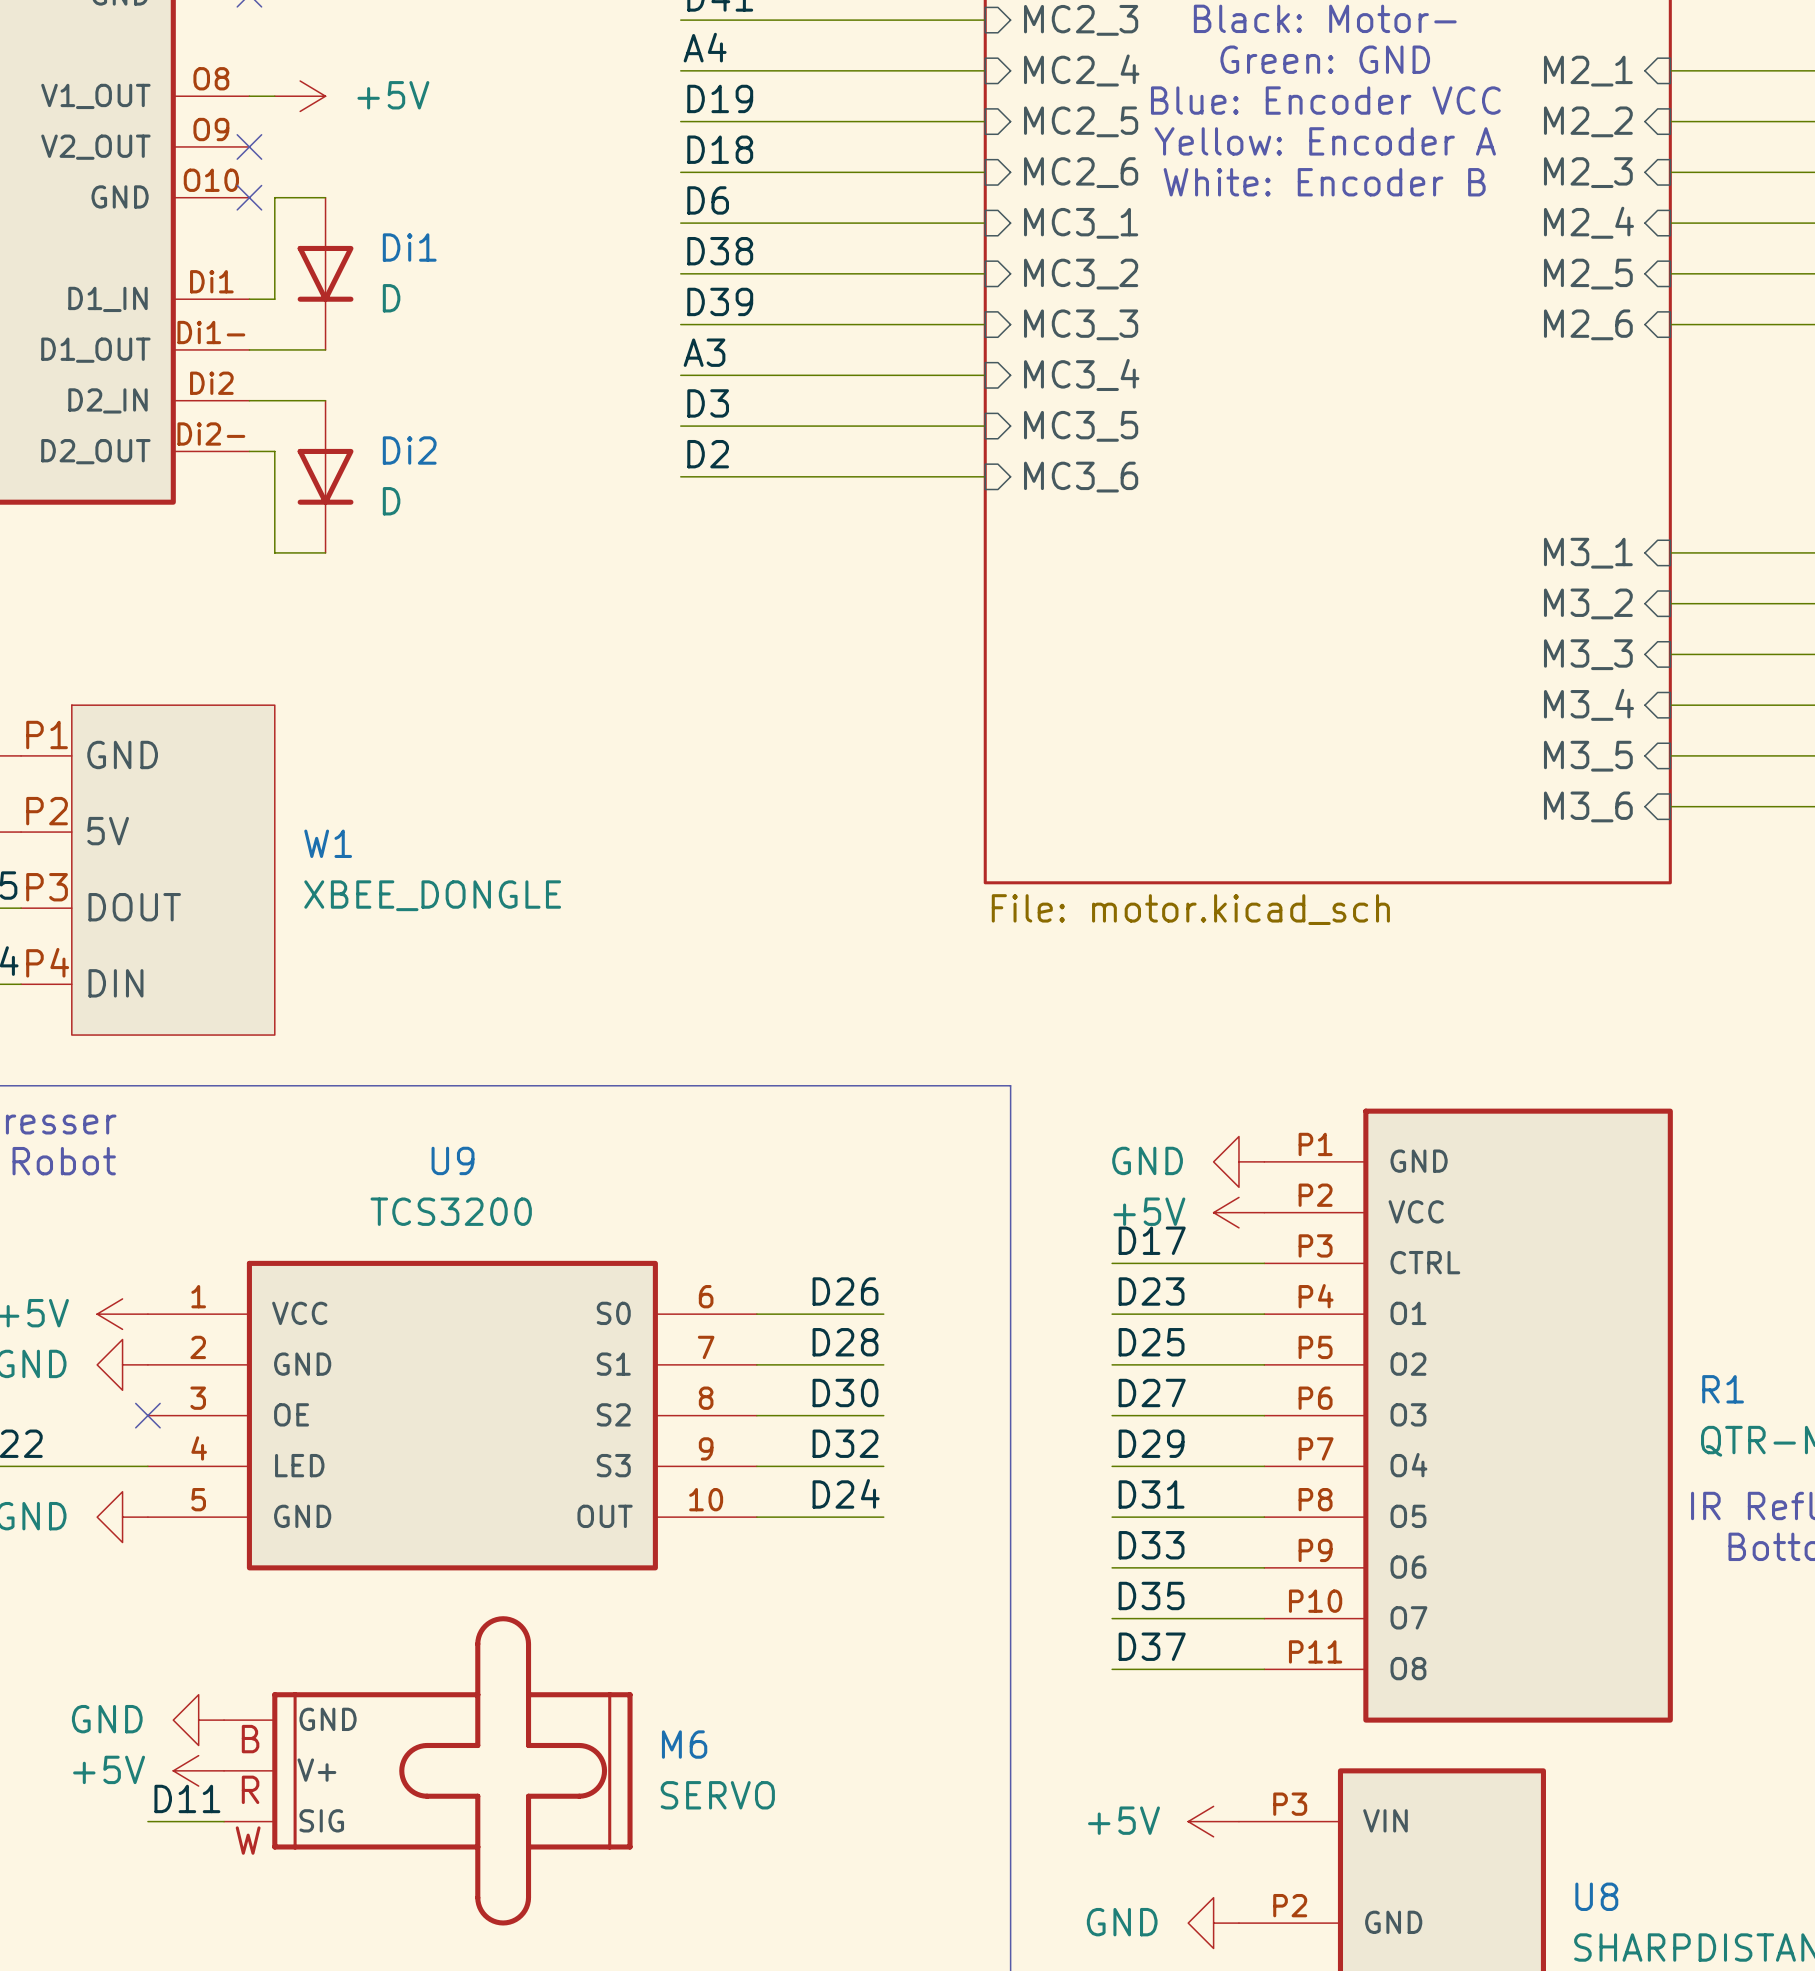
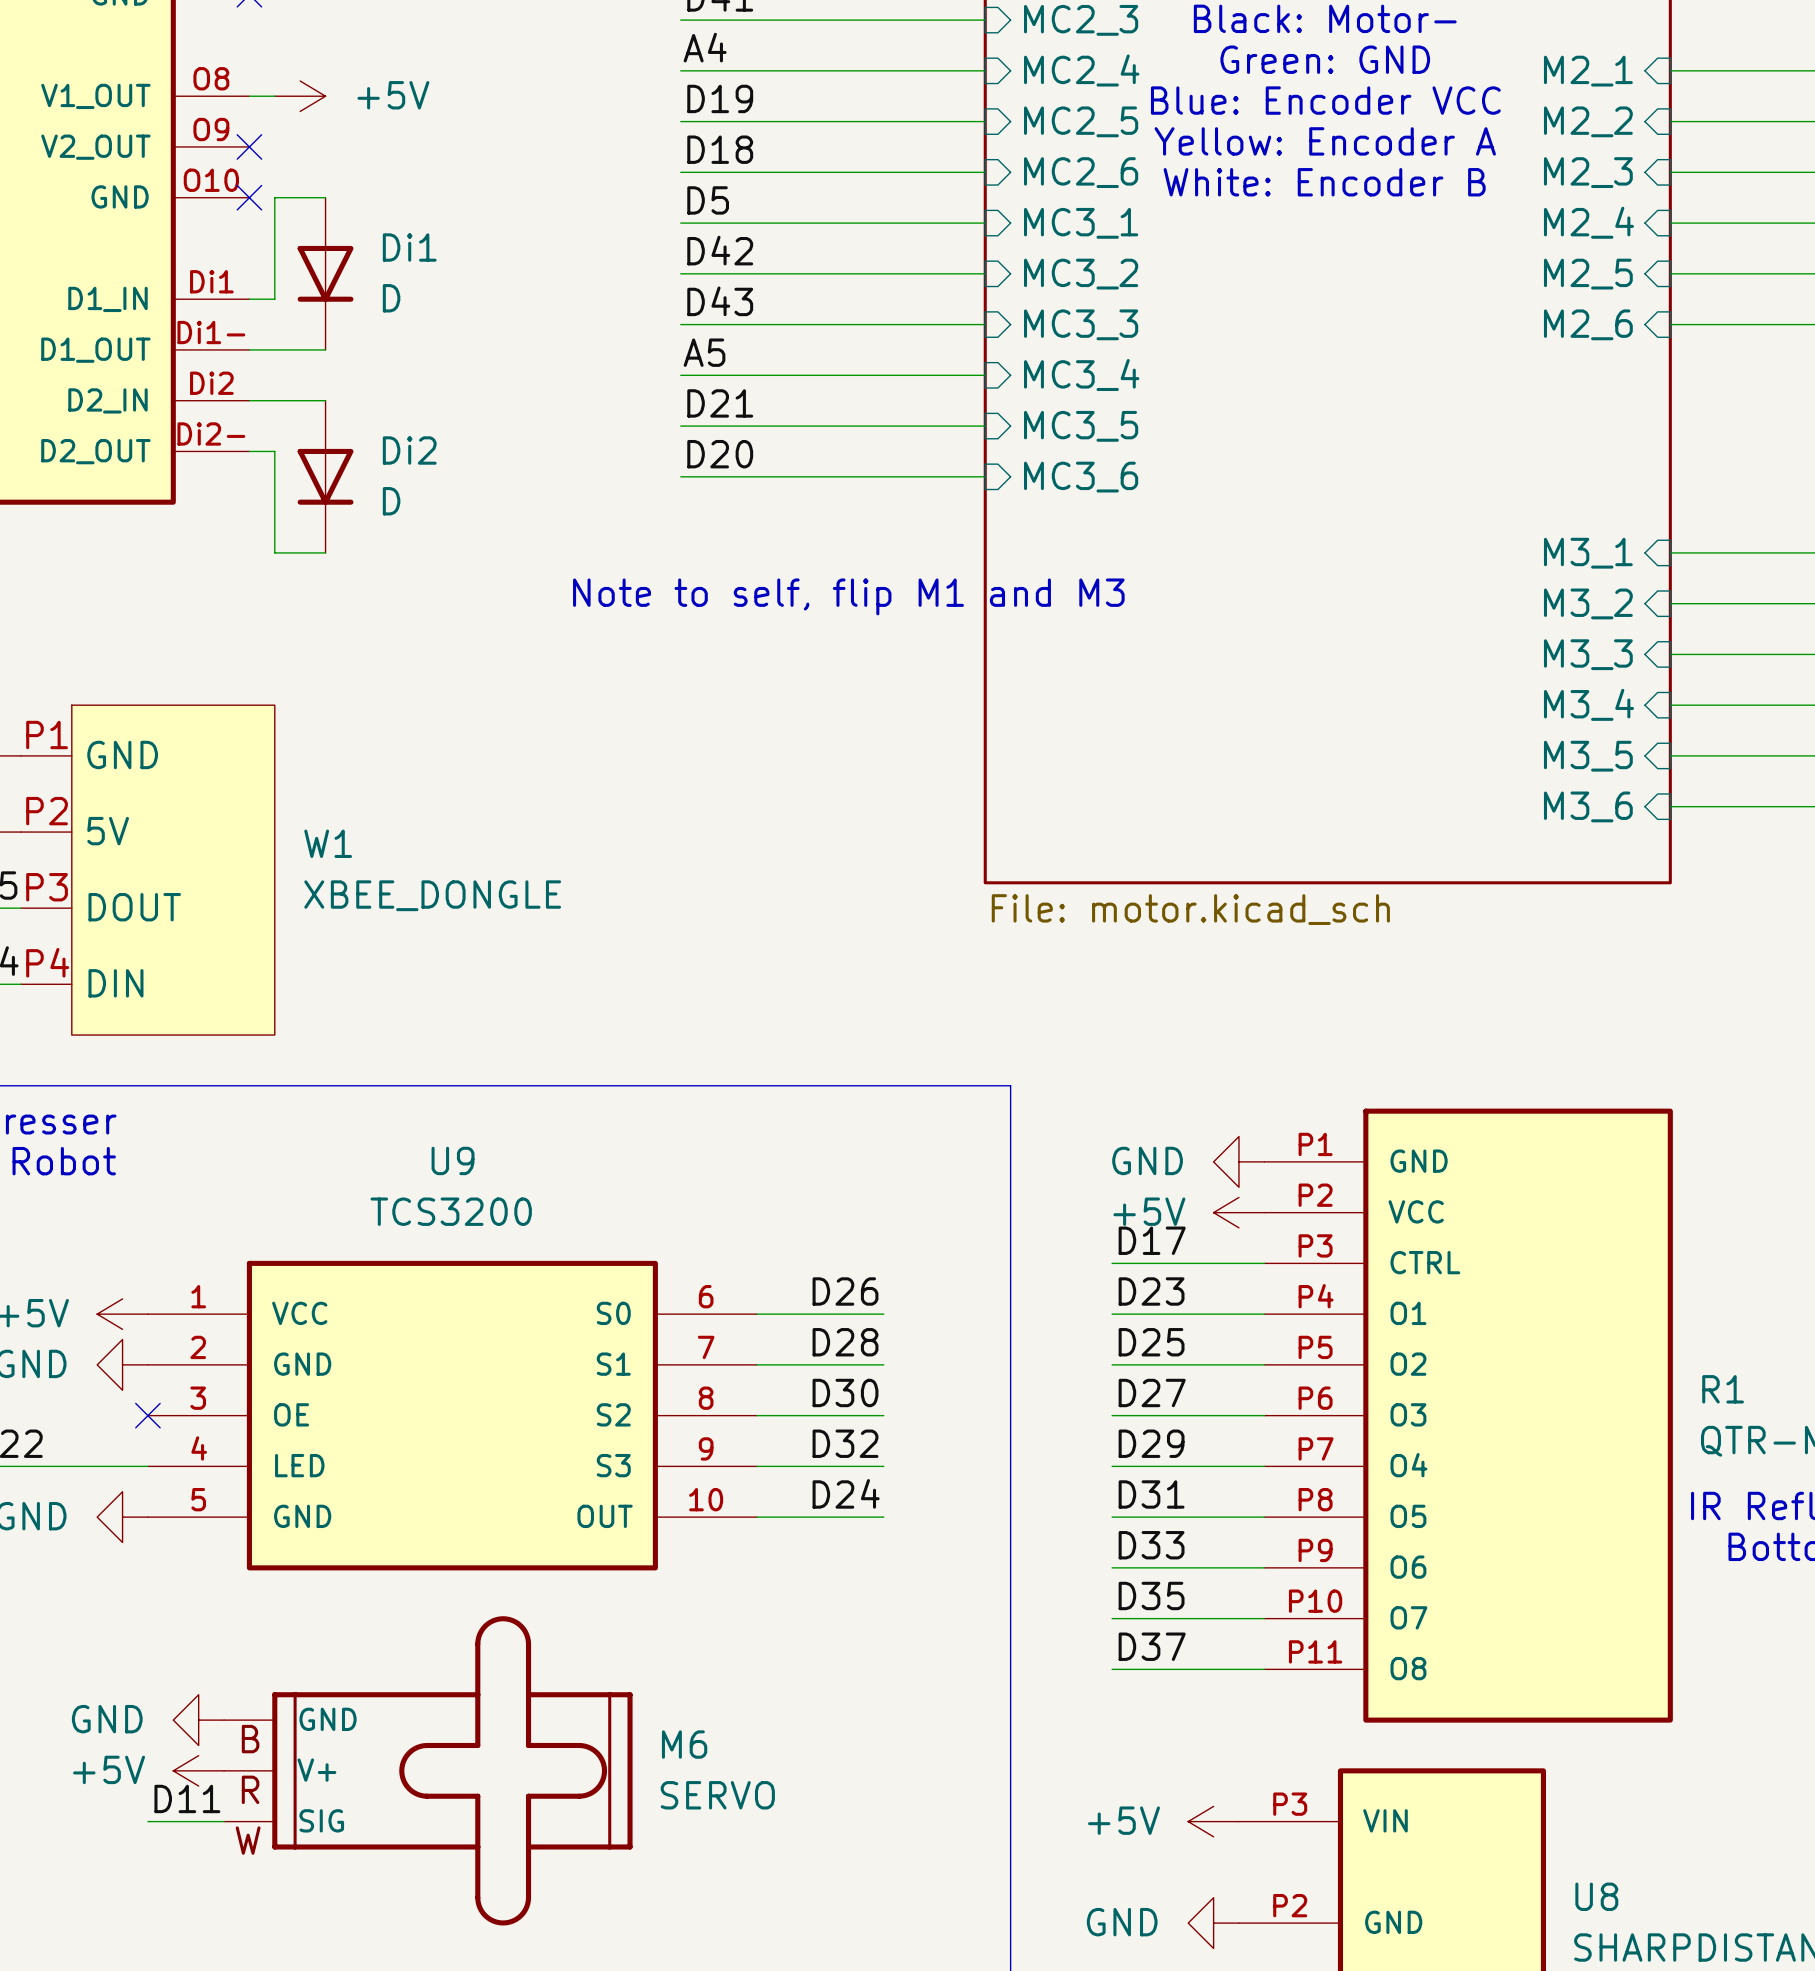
label: D6 (708, 200) -> D5 (708, 200)
label: D38 (720, 251) -> D42 (720, 250)
label: D39 (720, 301) -> D43 (720, 301)
label: A3 (704, 352) -> A5 (704, 352)
label: D3 (708, 403) -> D21 (720, 403)
label: D2 (708, 454) -> D20 (720, 454)
text: none -> Note to self, flip M1 and M3 (848, 596)

